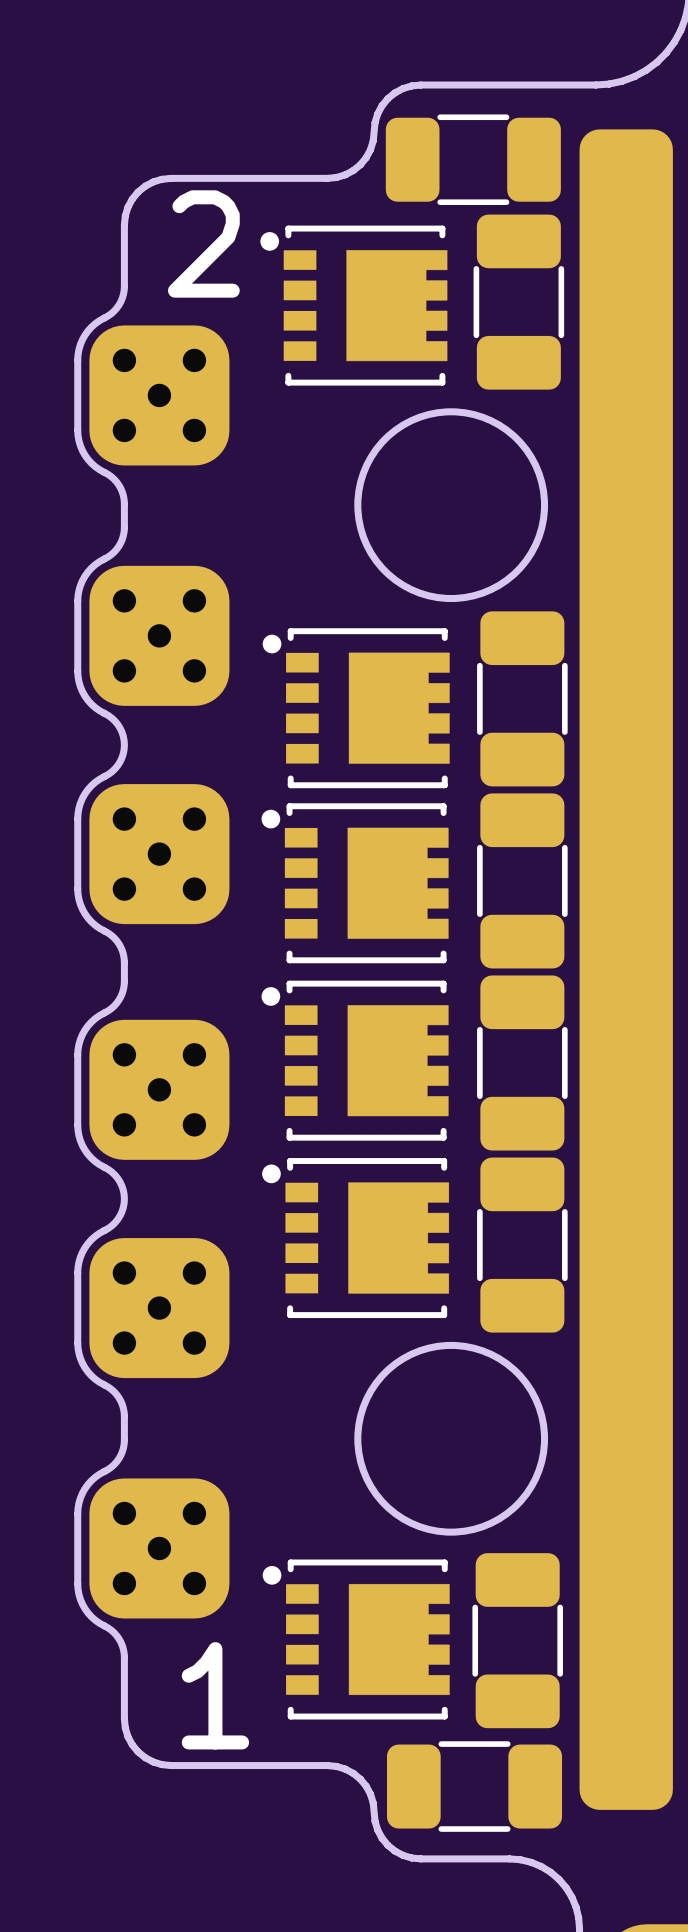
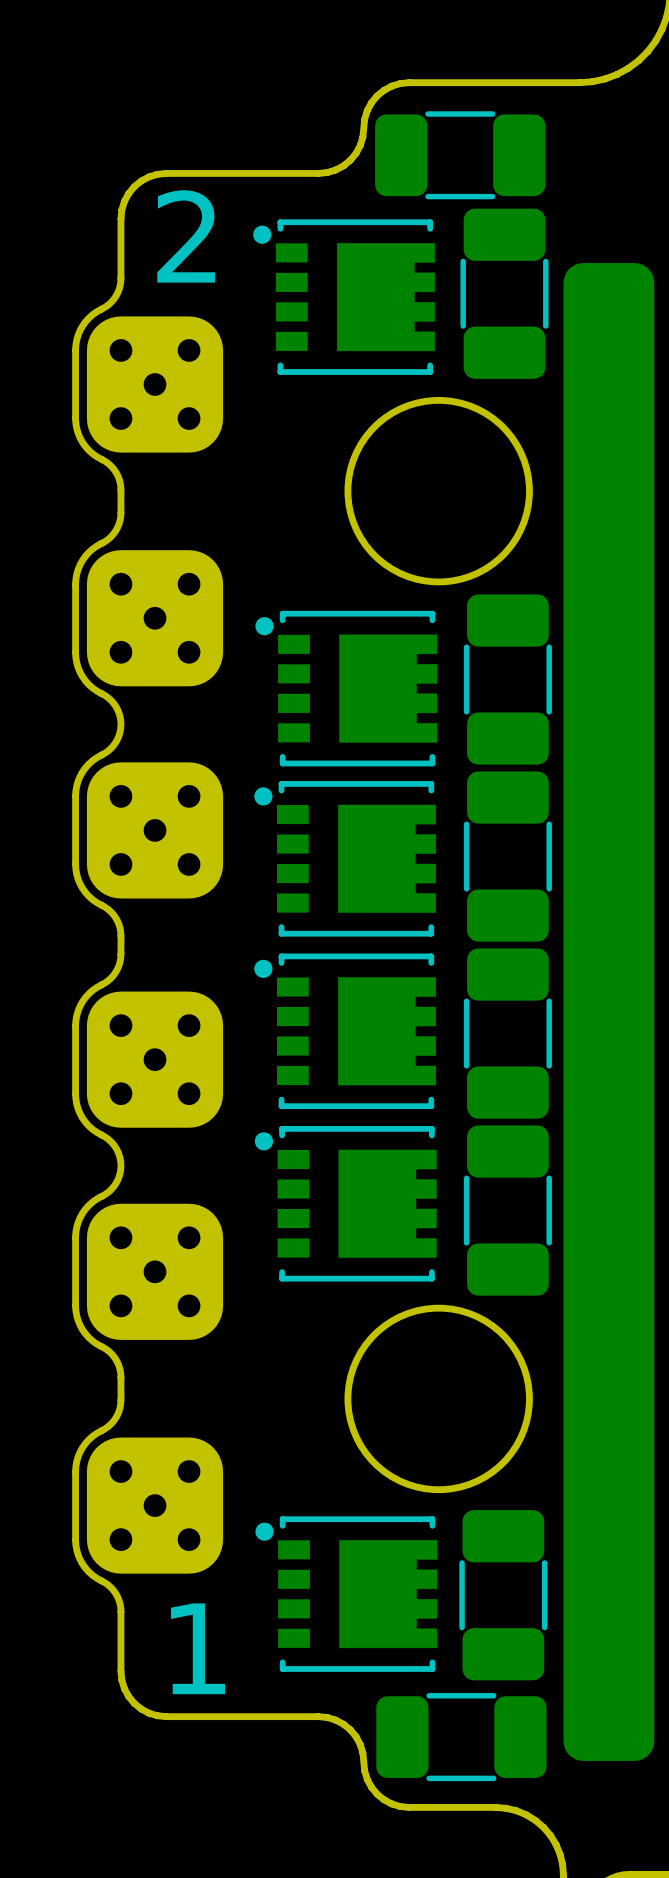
part: (626, 969) -> none
part: none -> (608, 1011)

